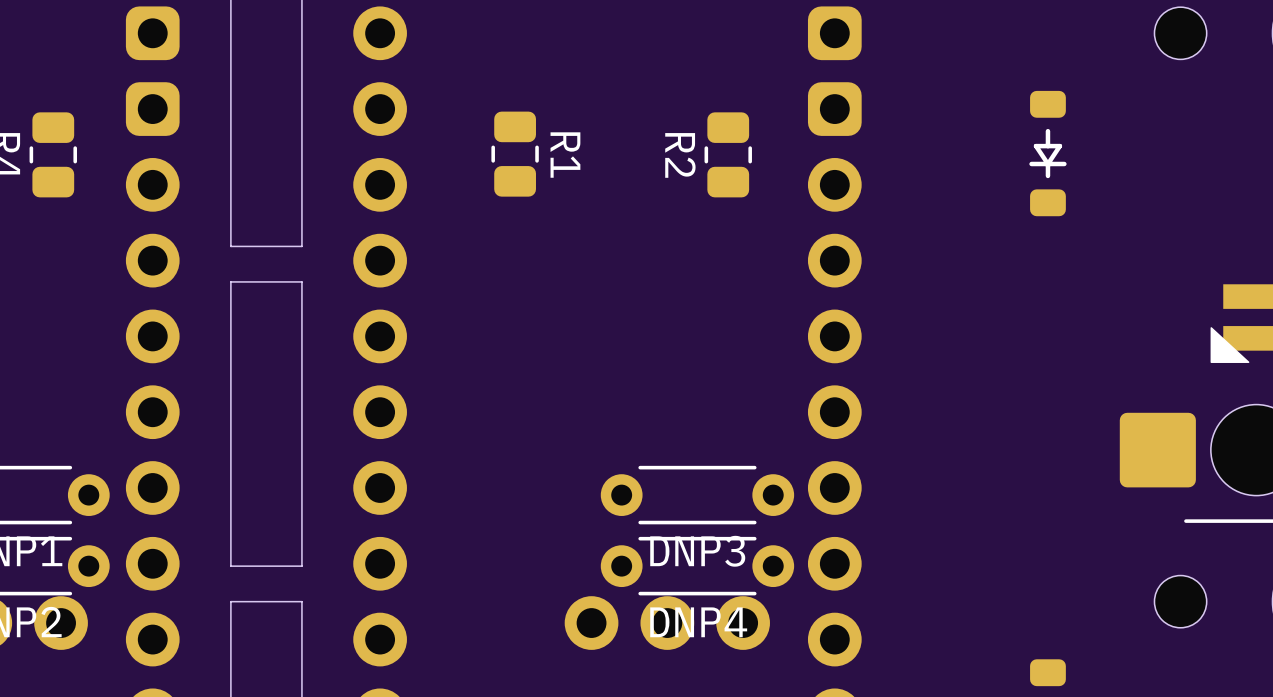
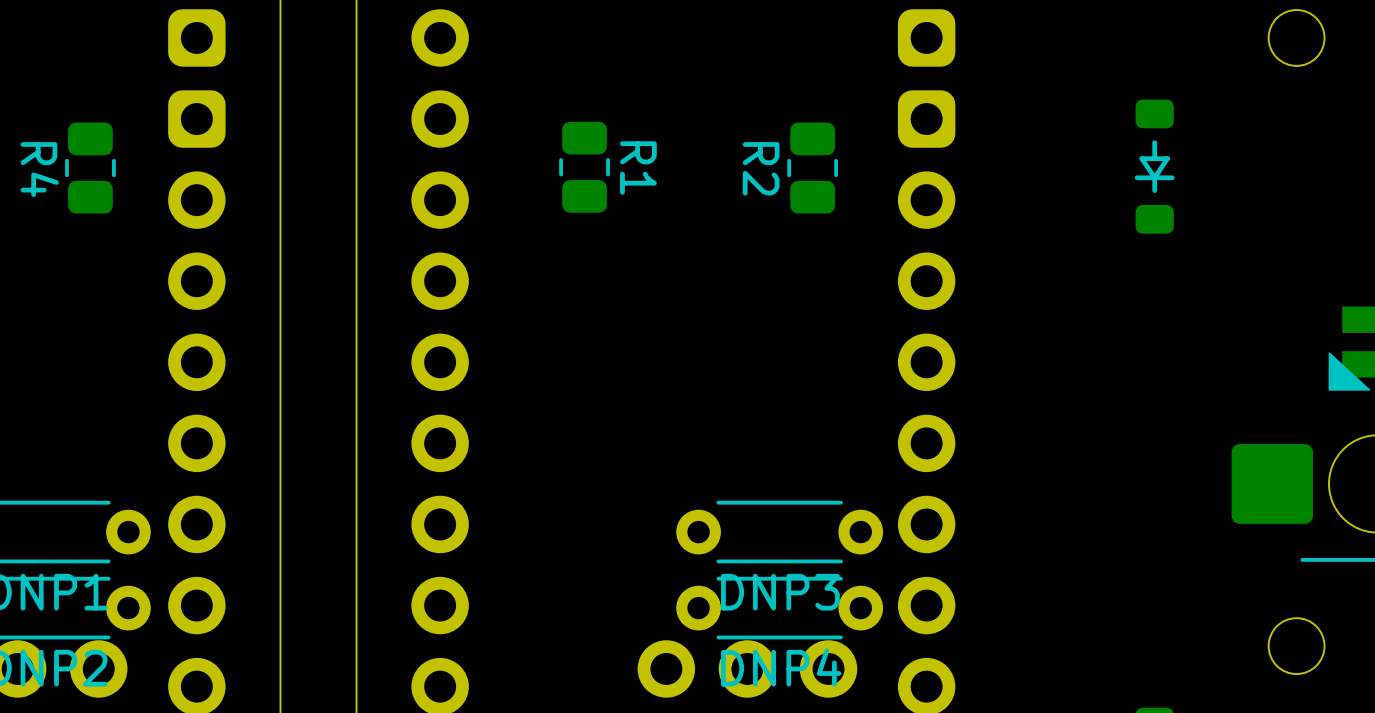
board edge: (301, 246) (230, 246) -> (356, 266) (356, 304)
board edge: (301, 281) (230, 281) -> (280, 266) (280, 304)
board edge: (301, 566) (230, 566) -> (356, 608) (356, 646)
board edge: (301, 601) (230, 601) -> (280, 608) (280, 646)

